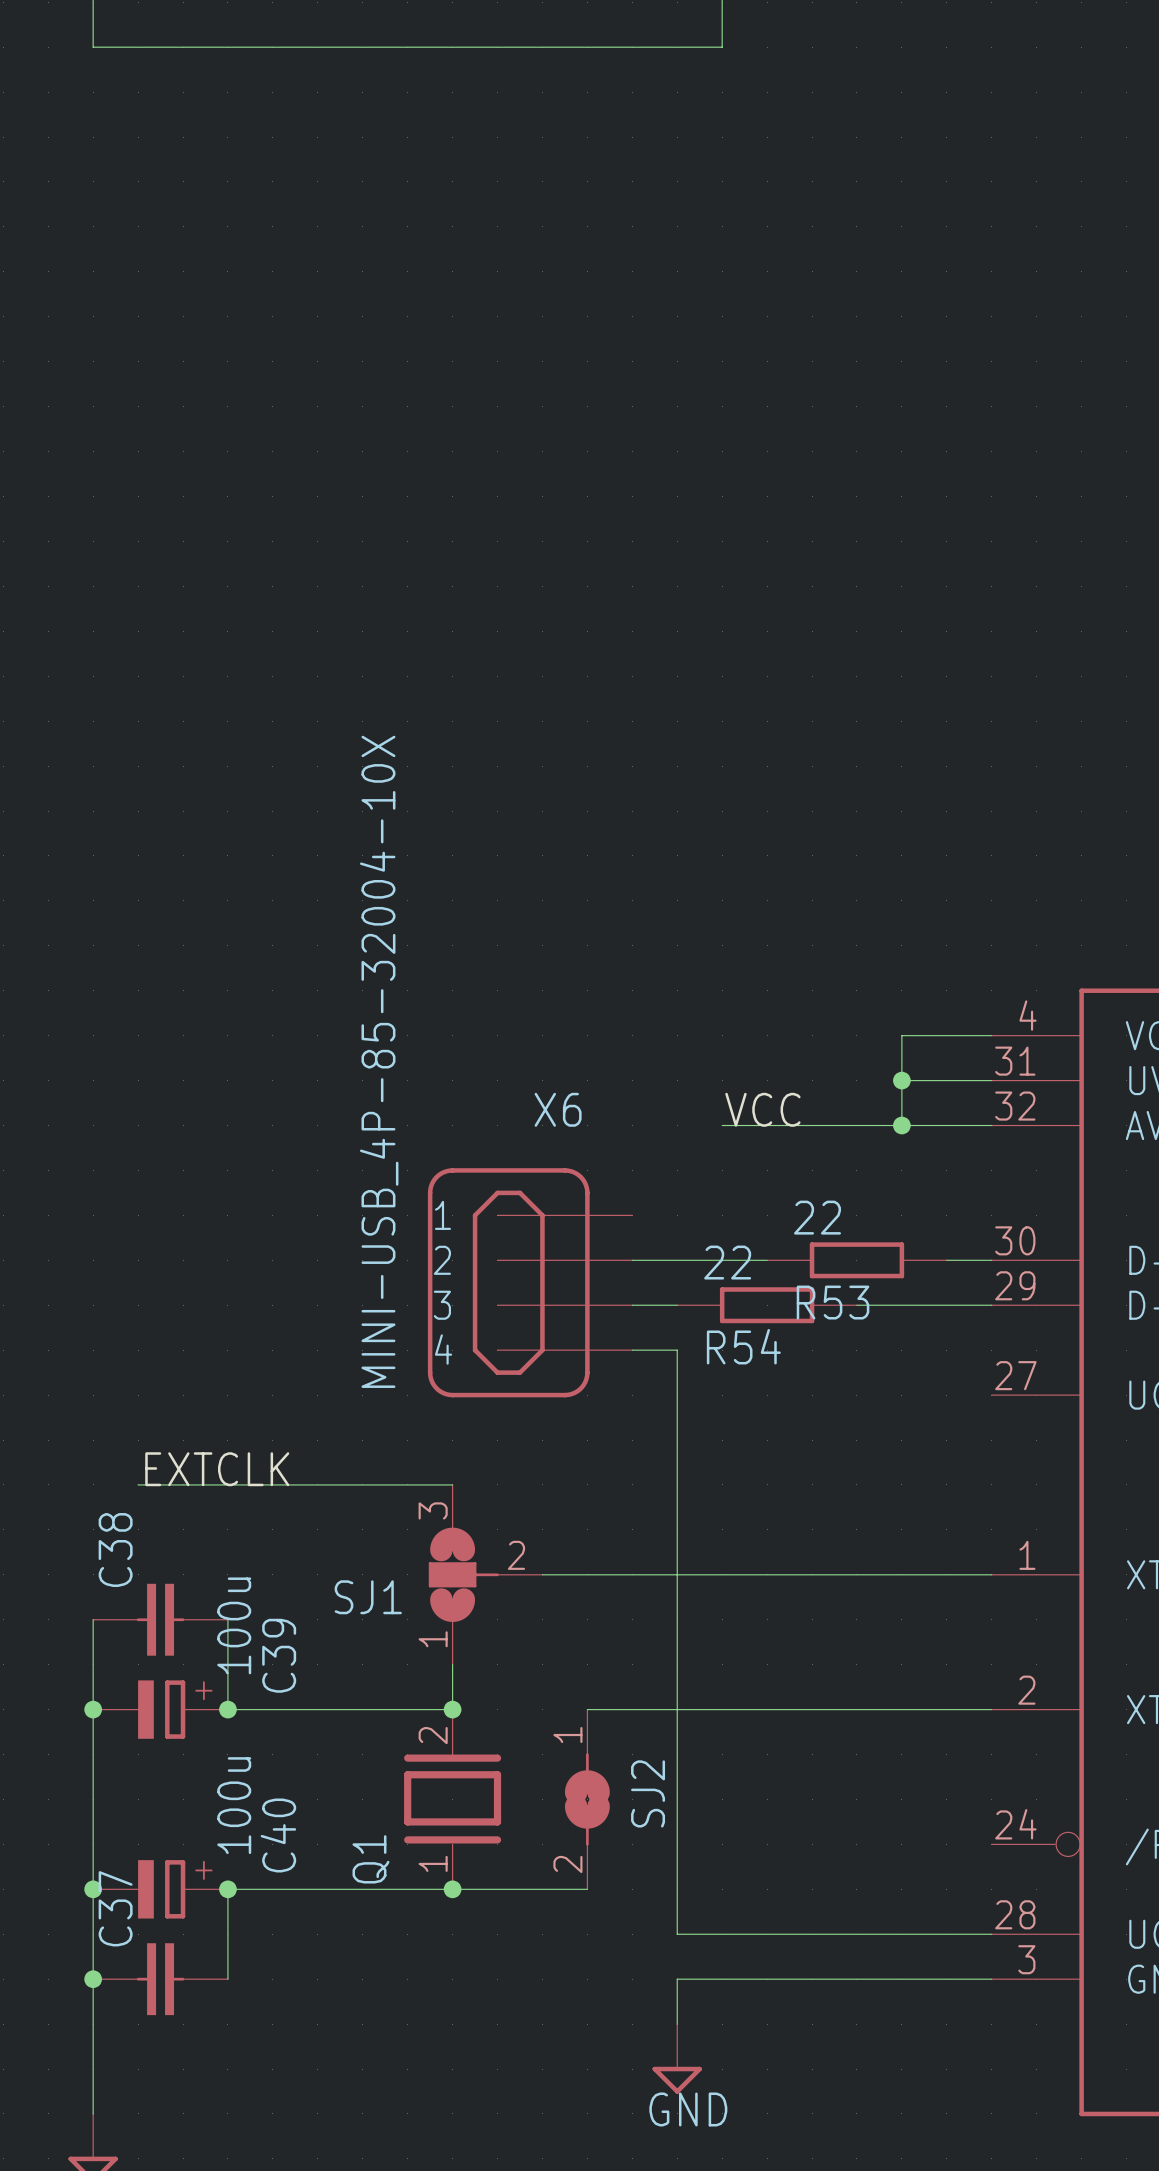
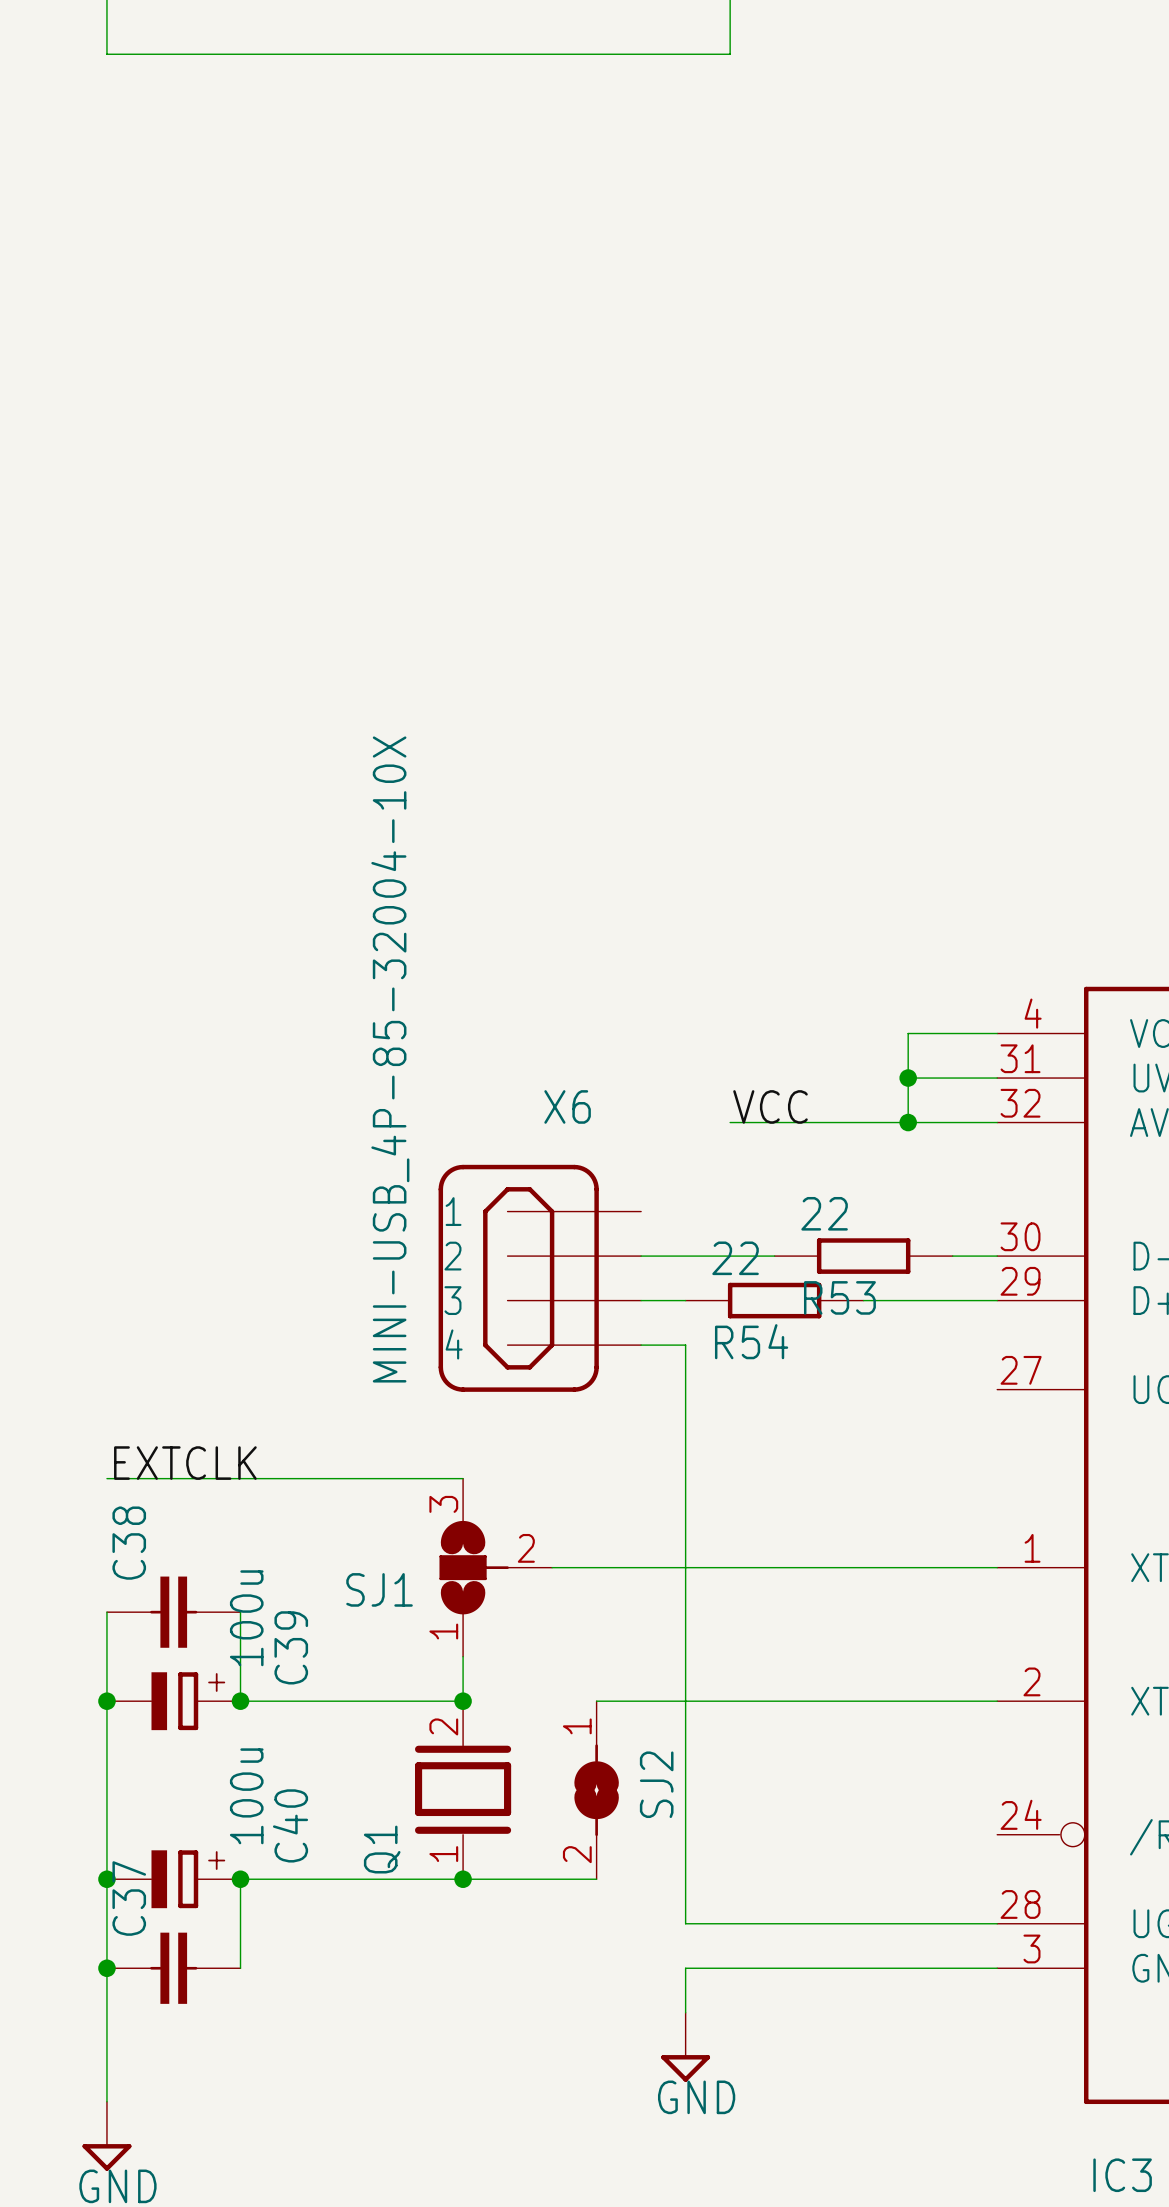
label position: EXTCLK (217, 1469) -> EXTCLK (185, 1463)
wire: none -> (106, 1478) (151, 1478)

